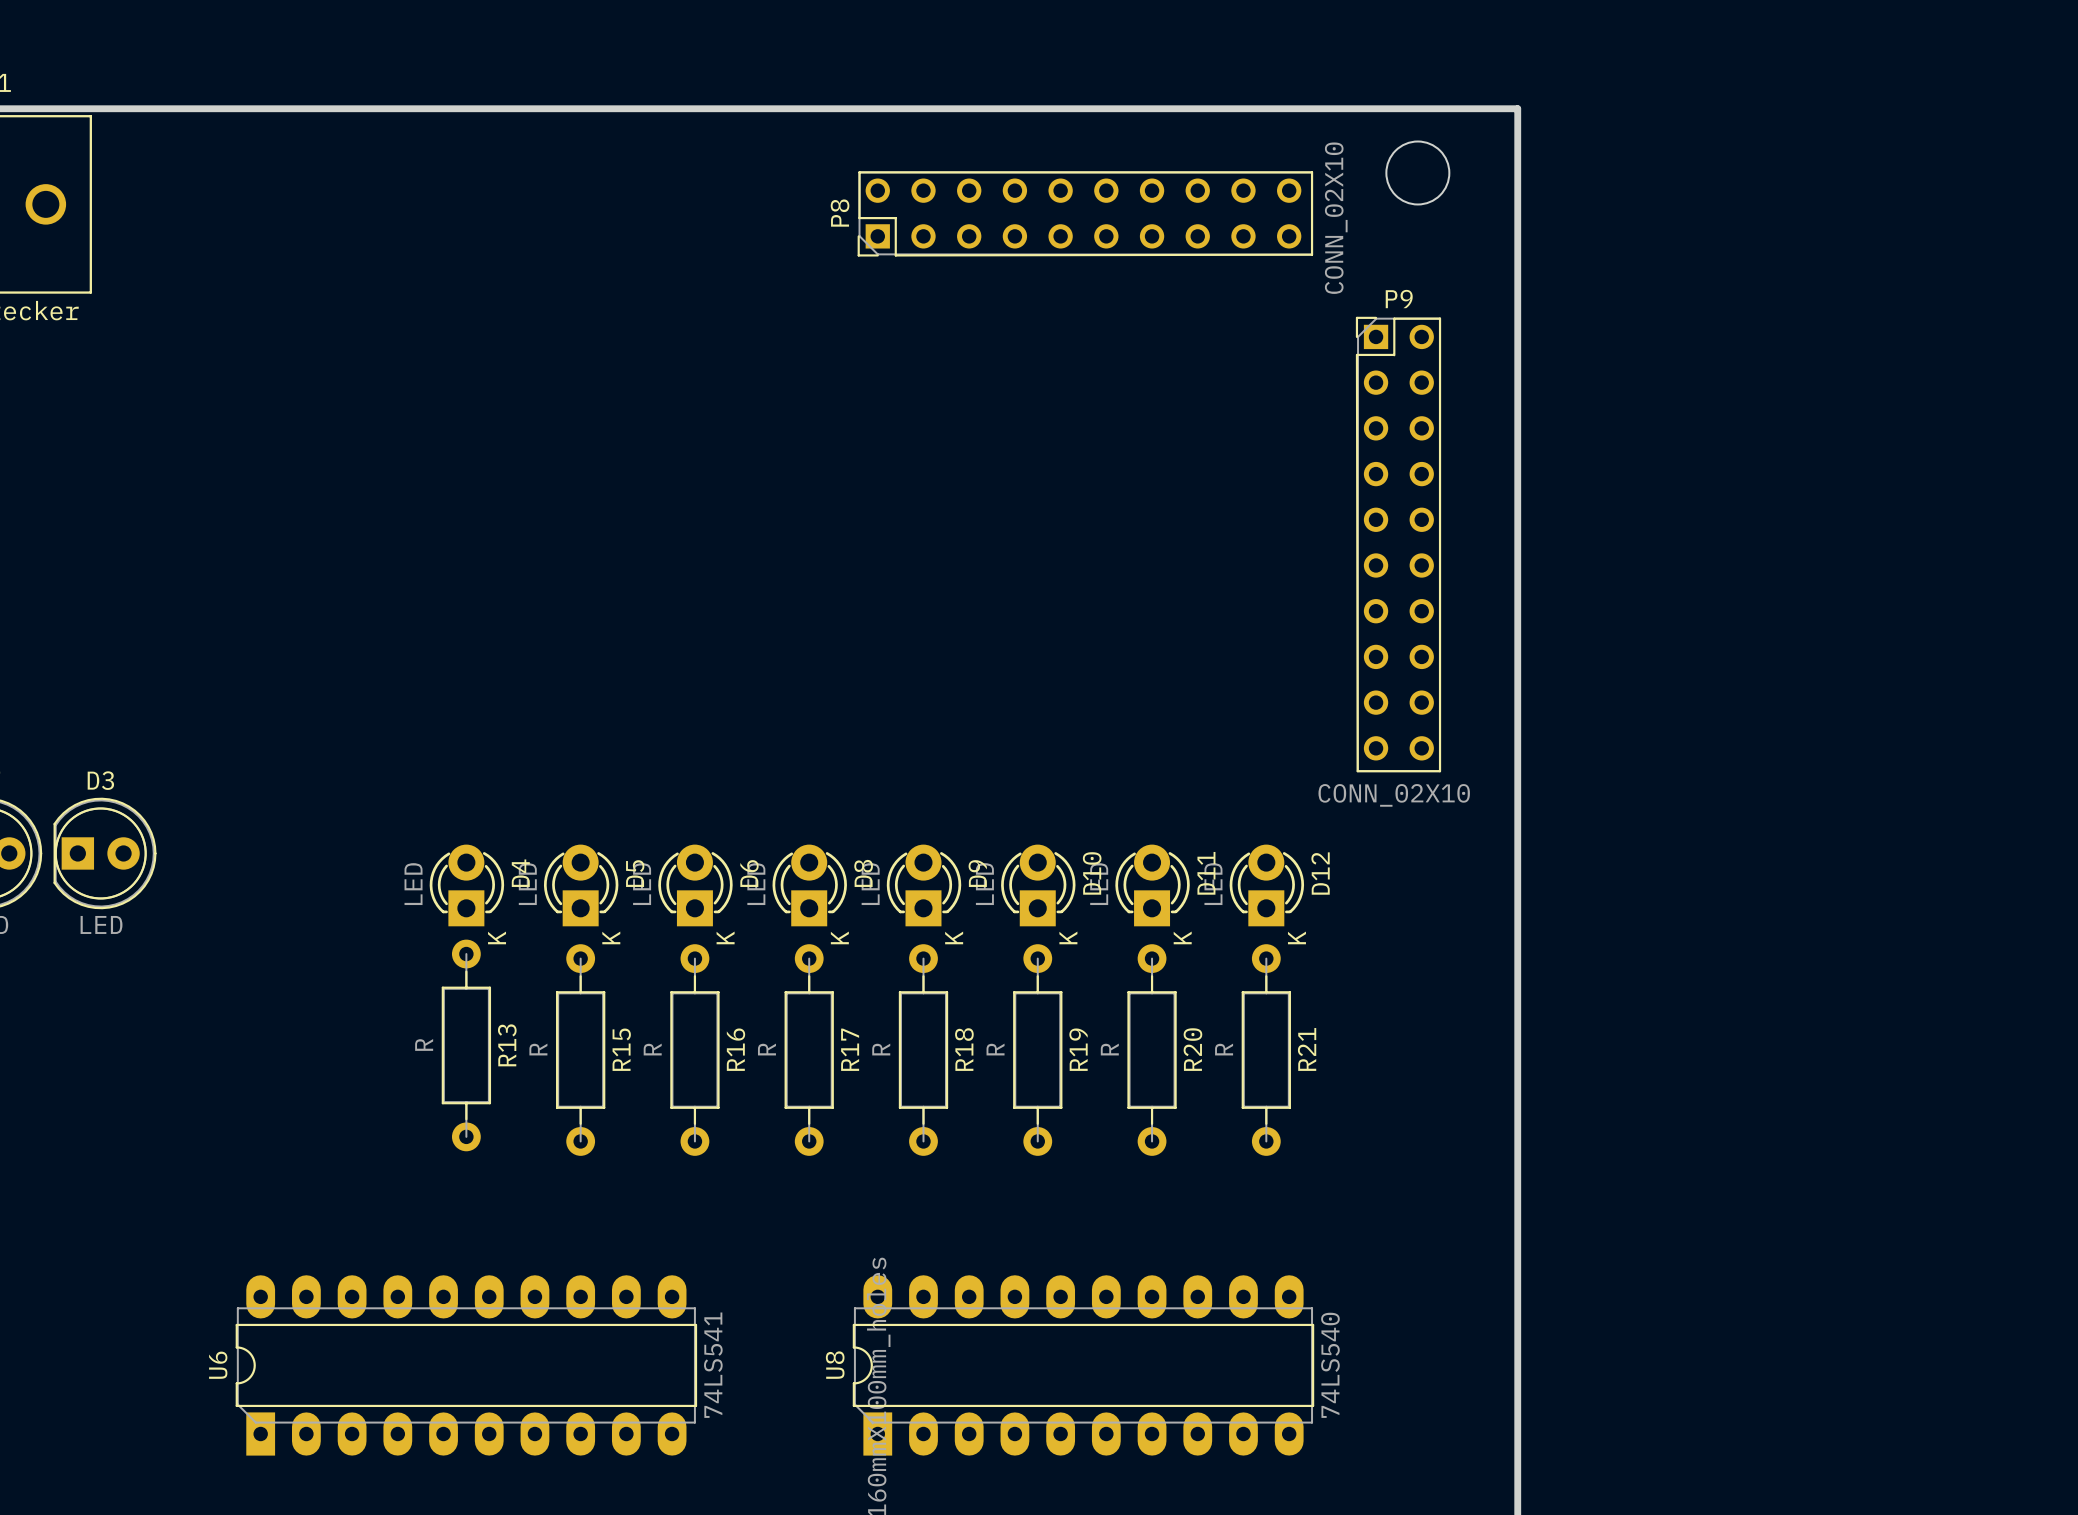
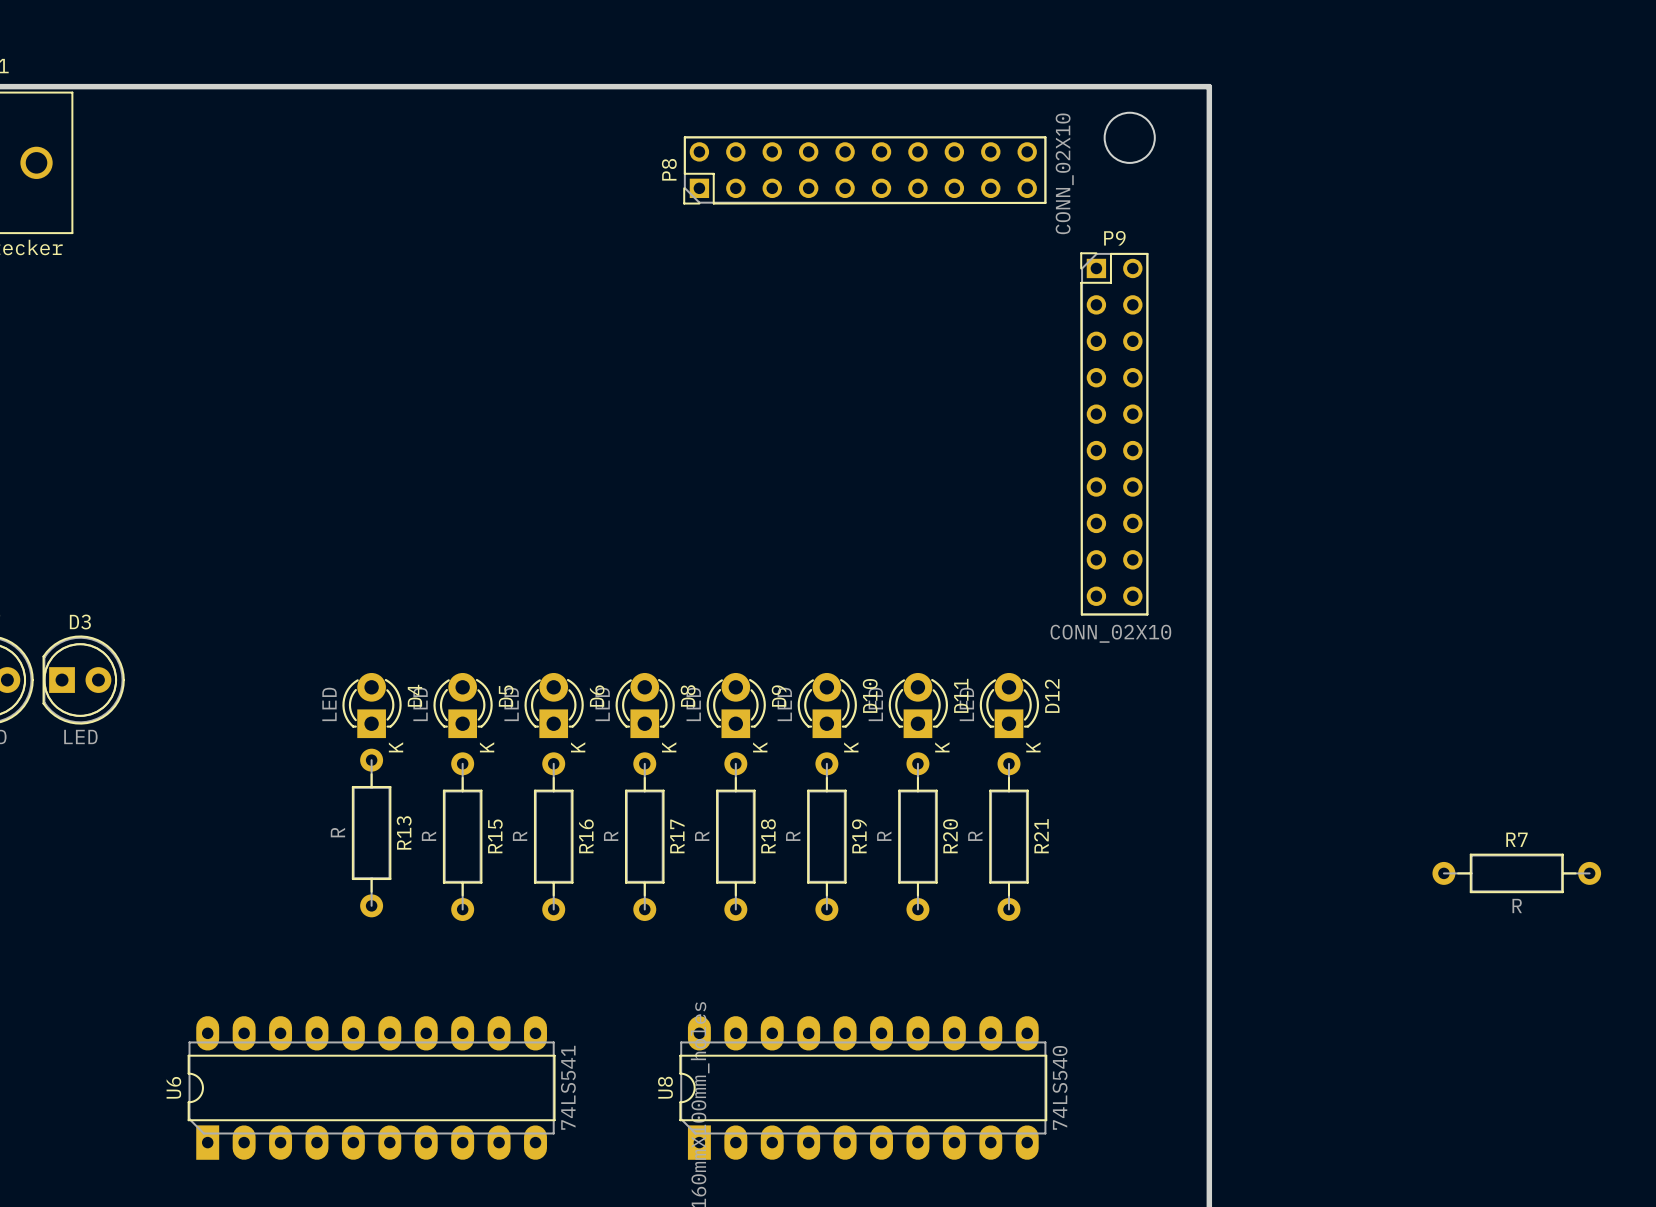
R7: none -> R (1516, 873)

